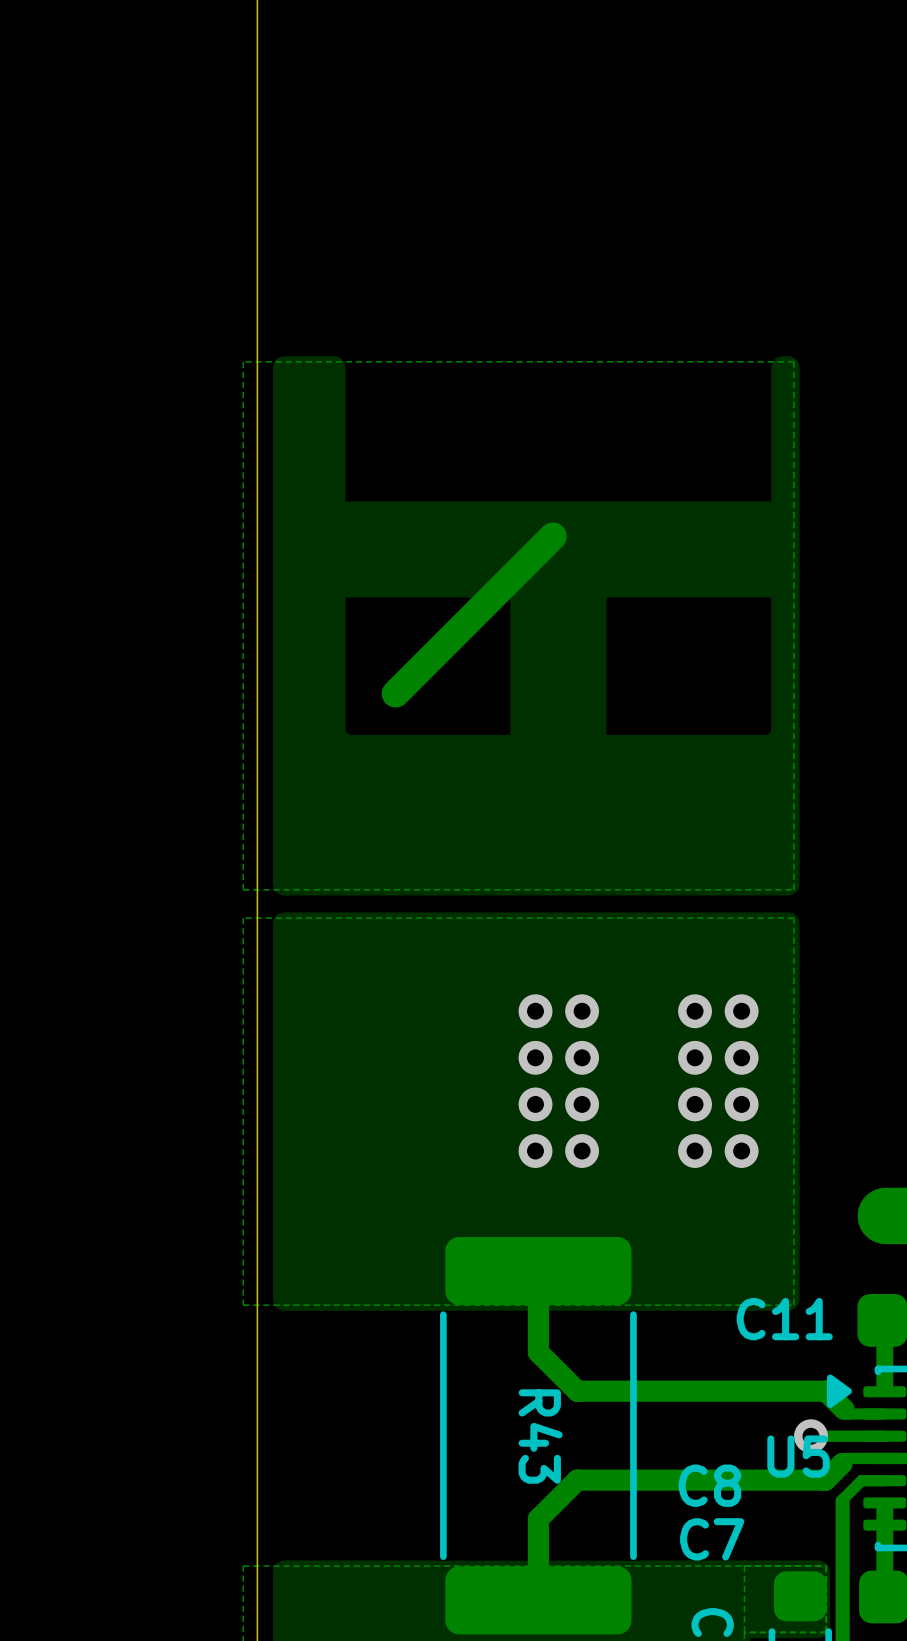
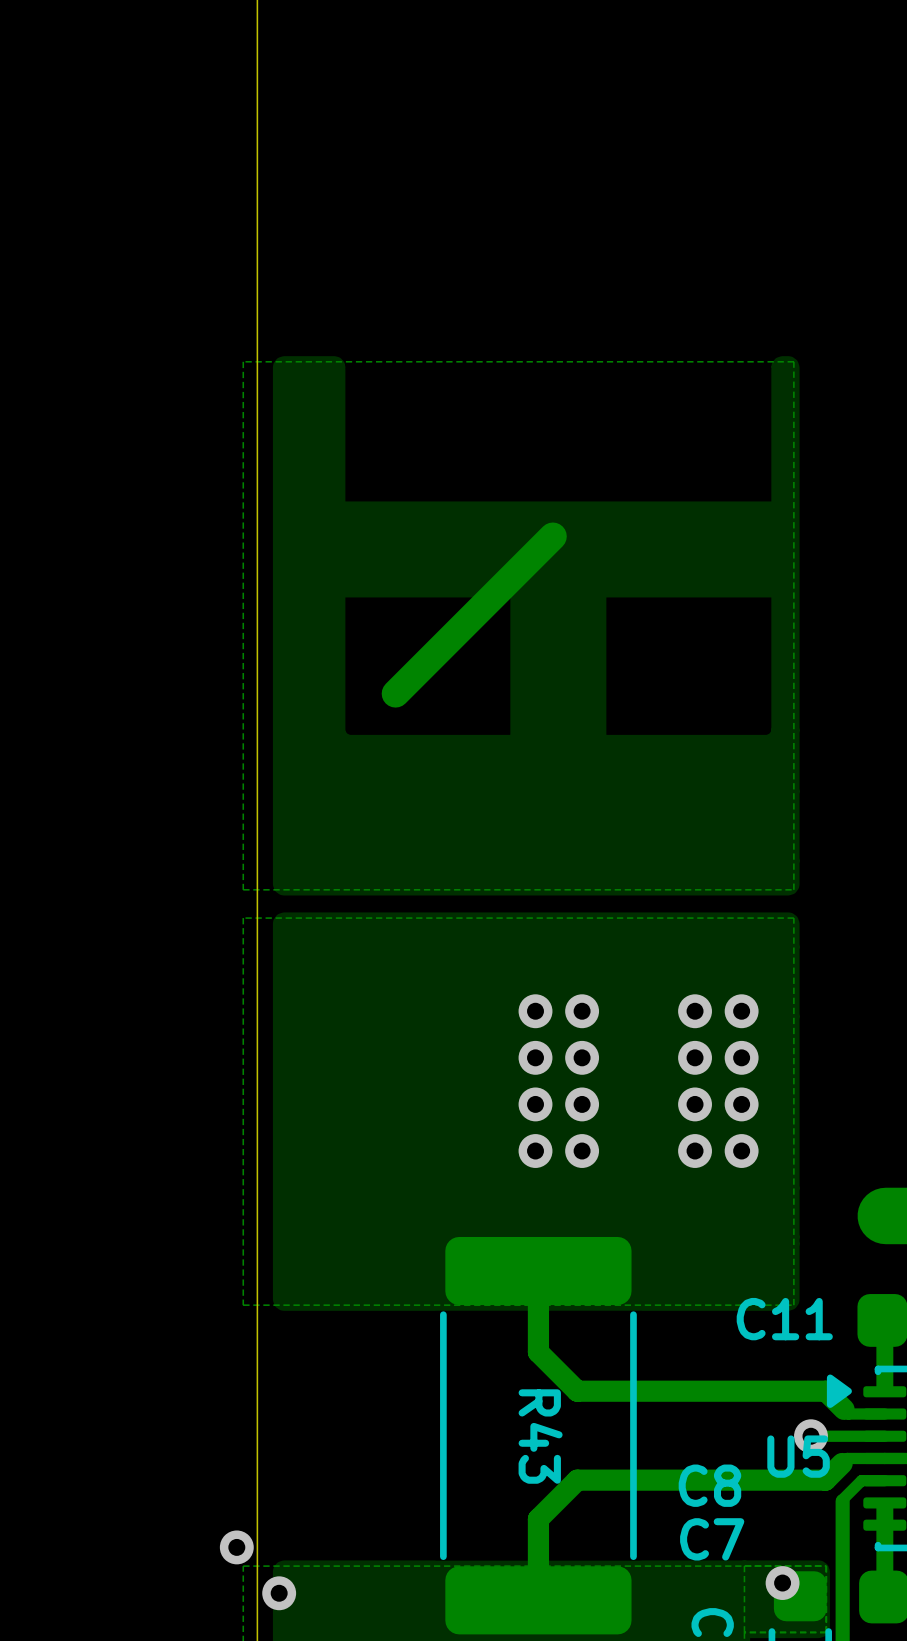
via: none -> (236, 1547)
via: none -> (782, 1583)
via: none -> (279, 1593)

